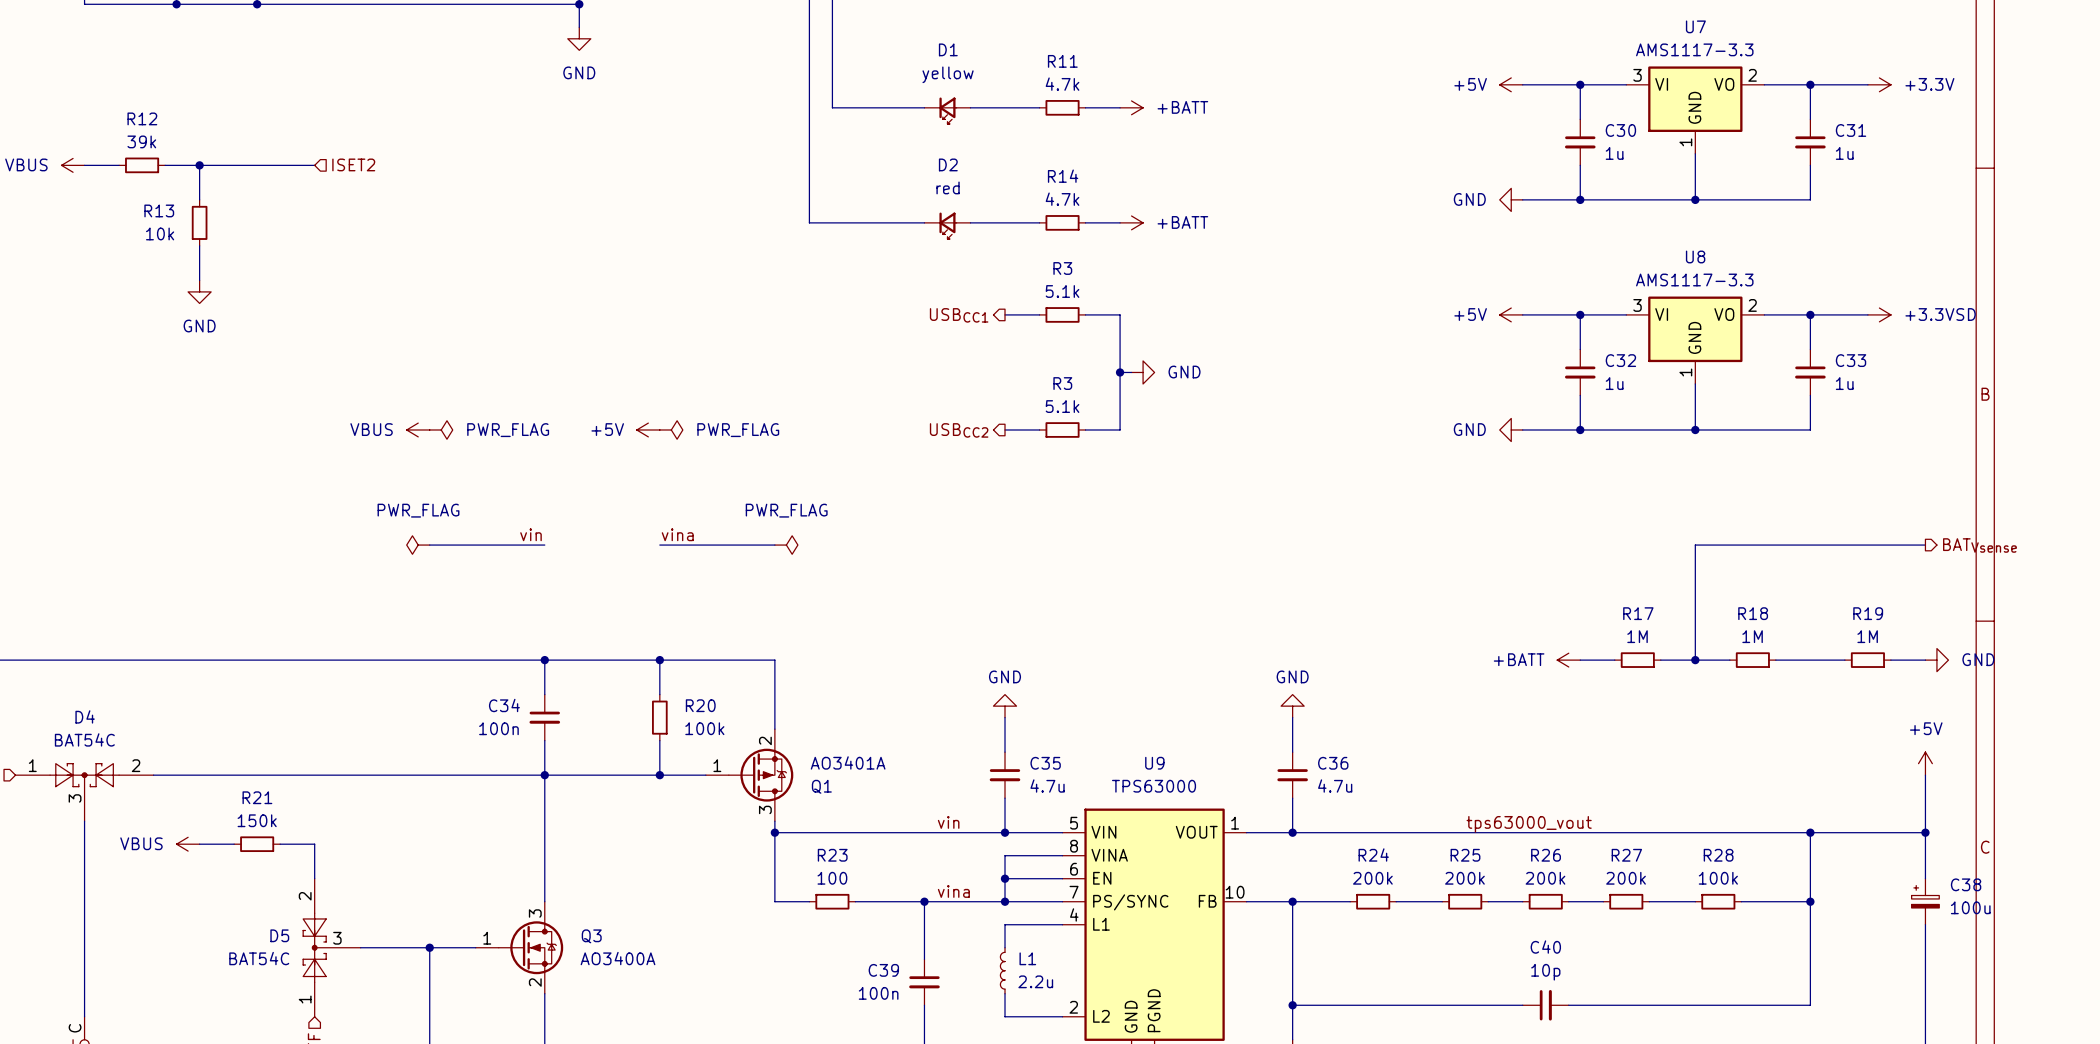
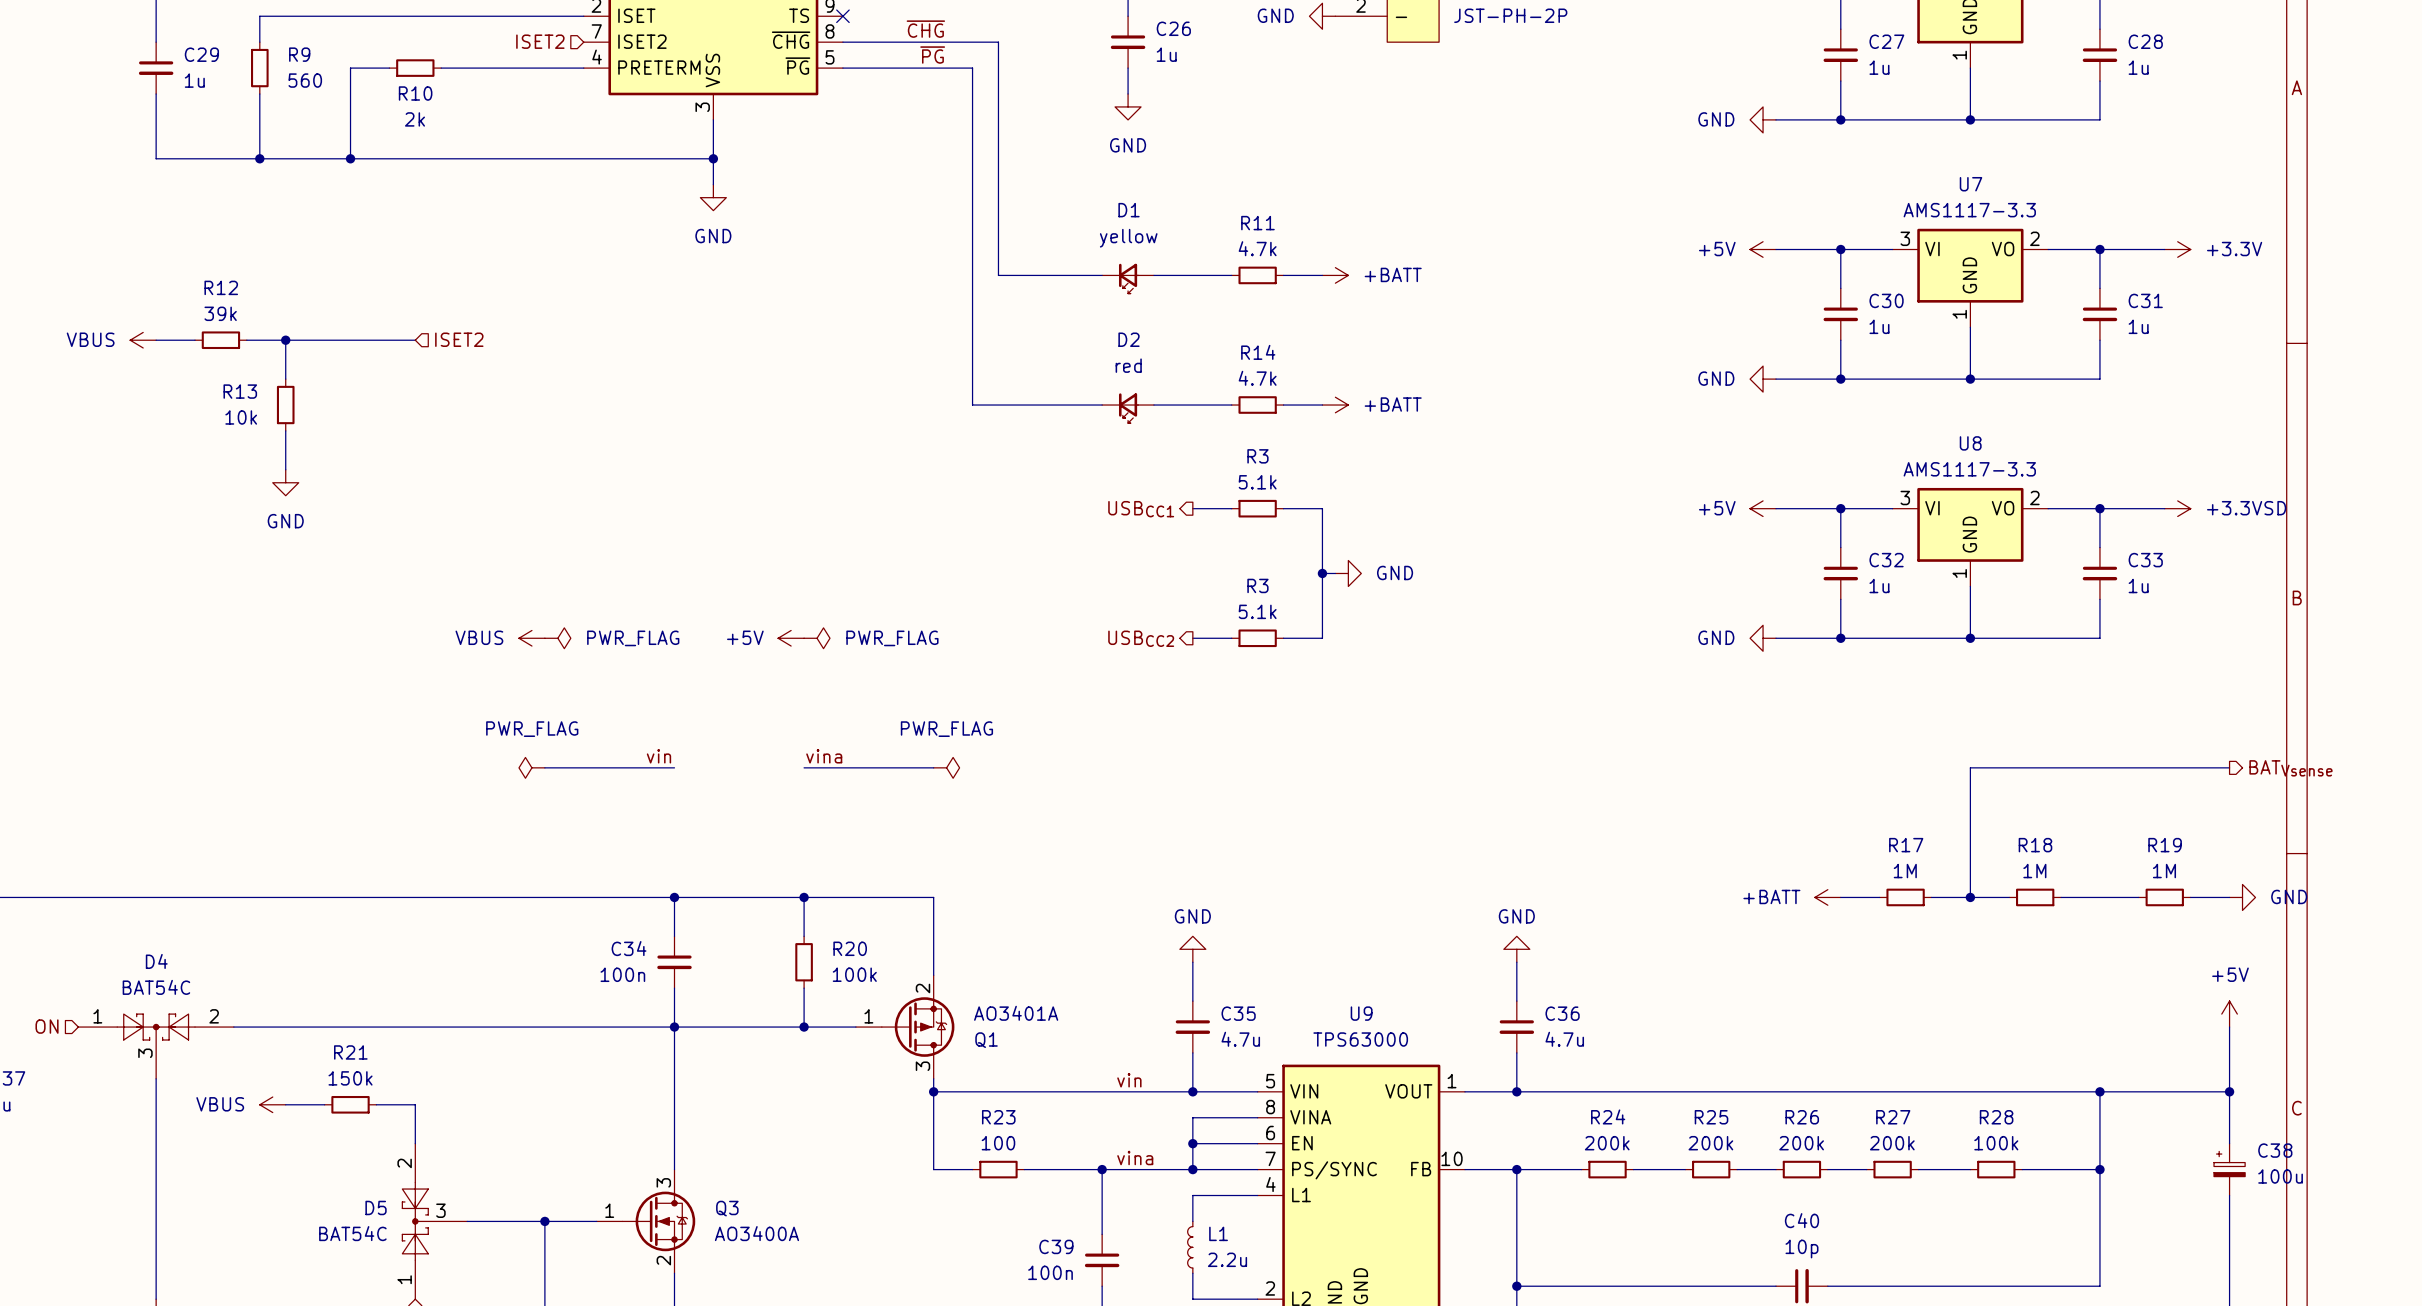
label: tps63000_vout (1529, 824) -> none

